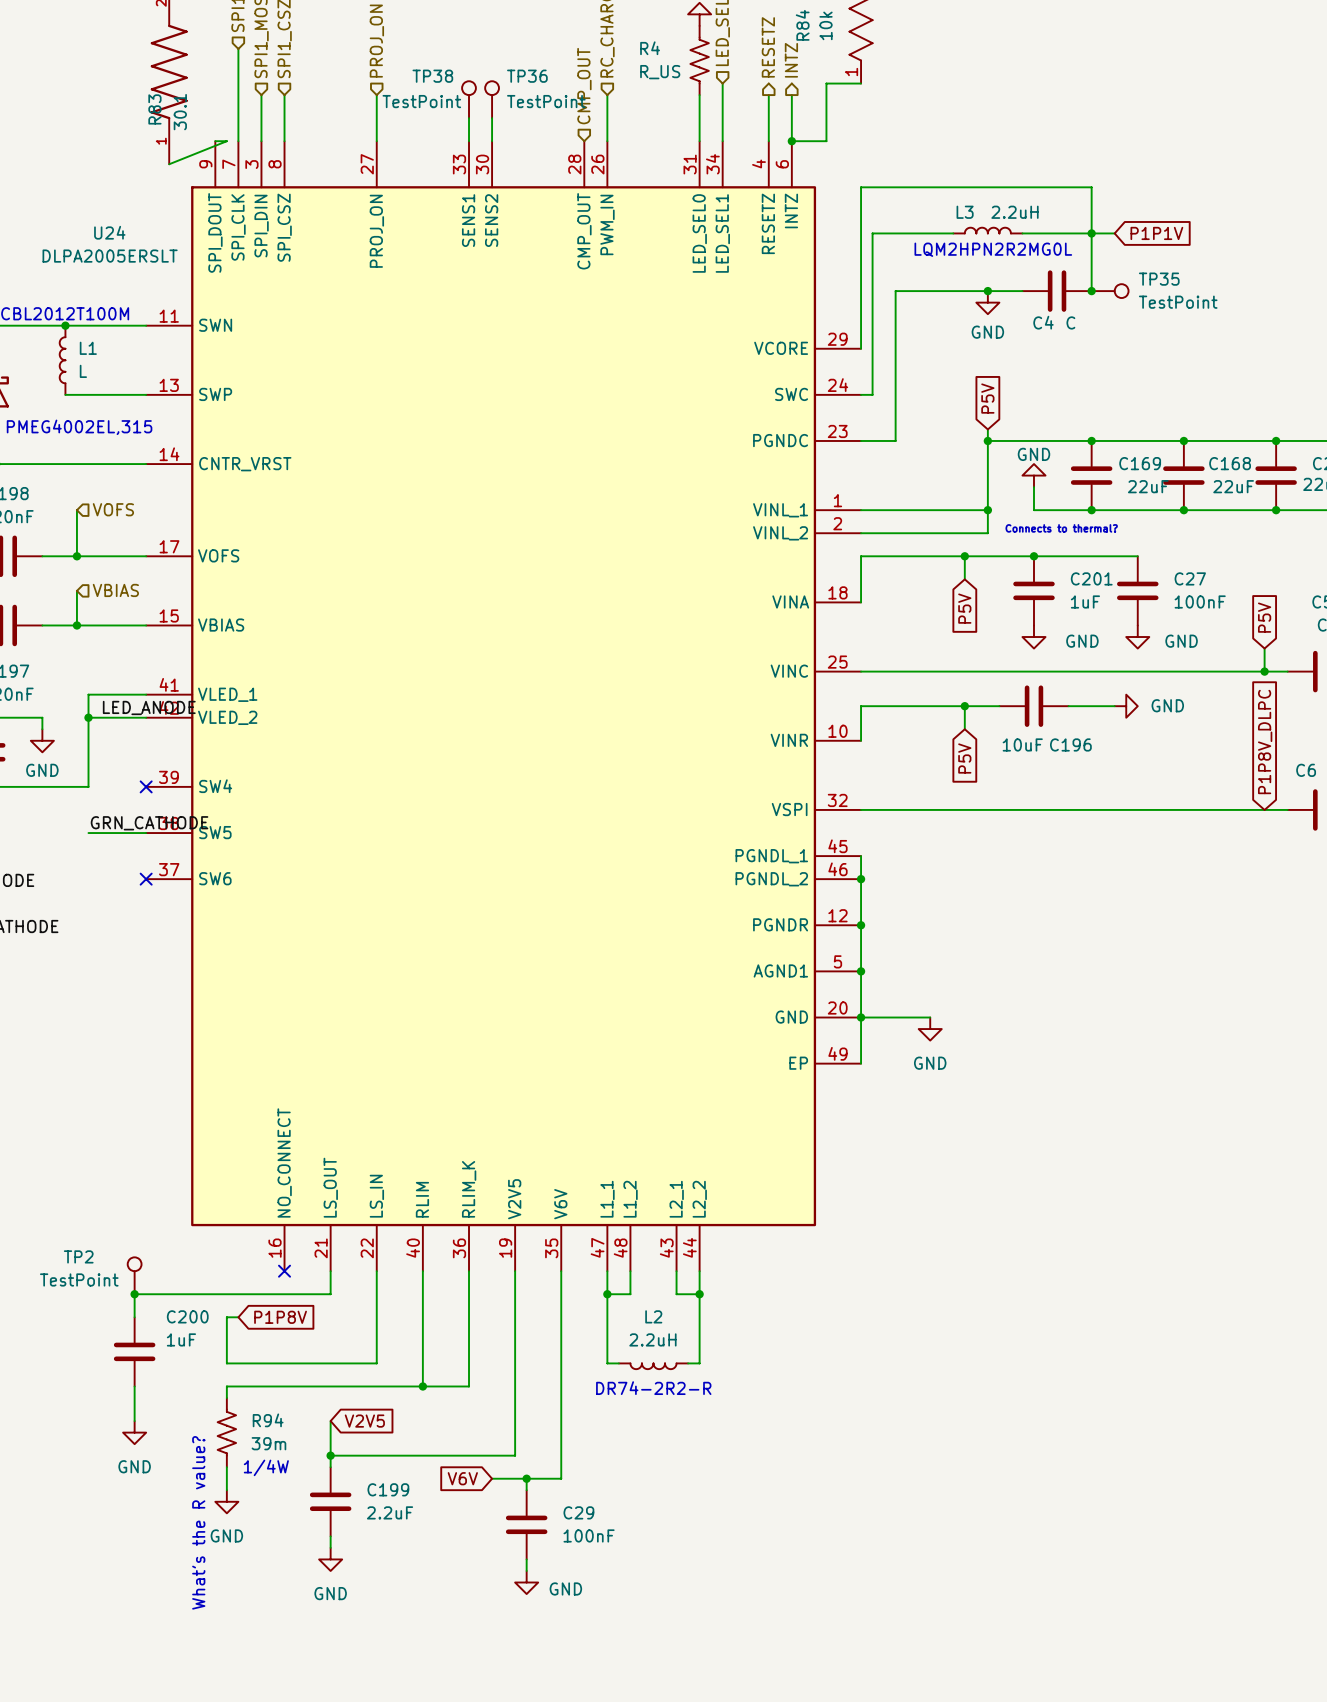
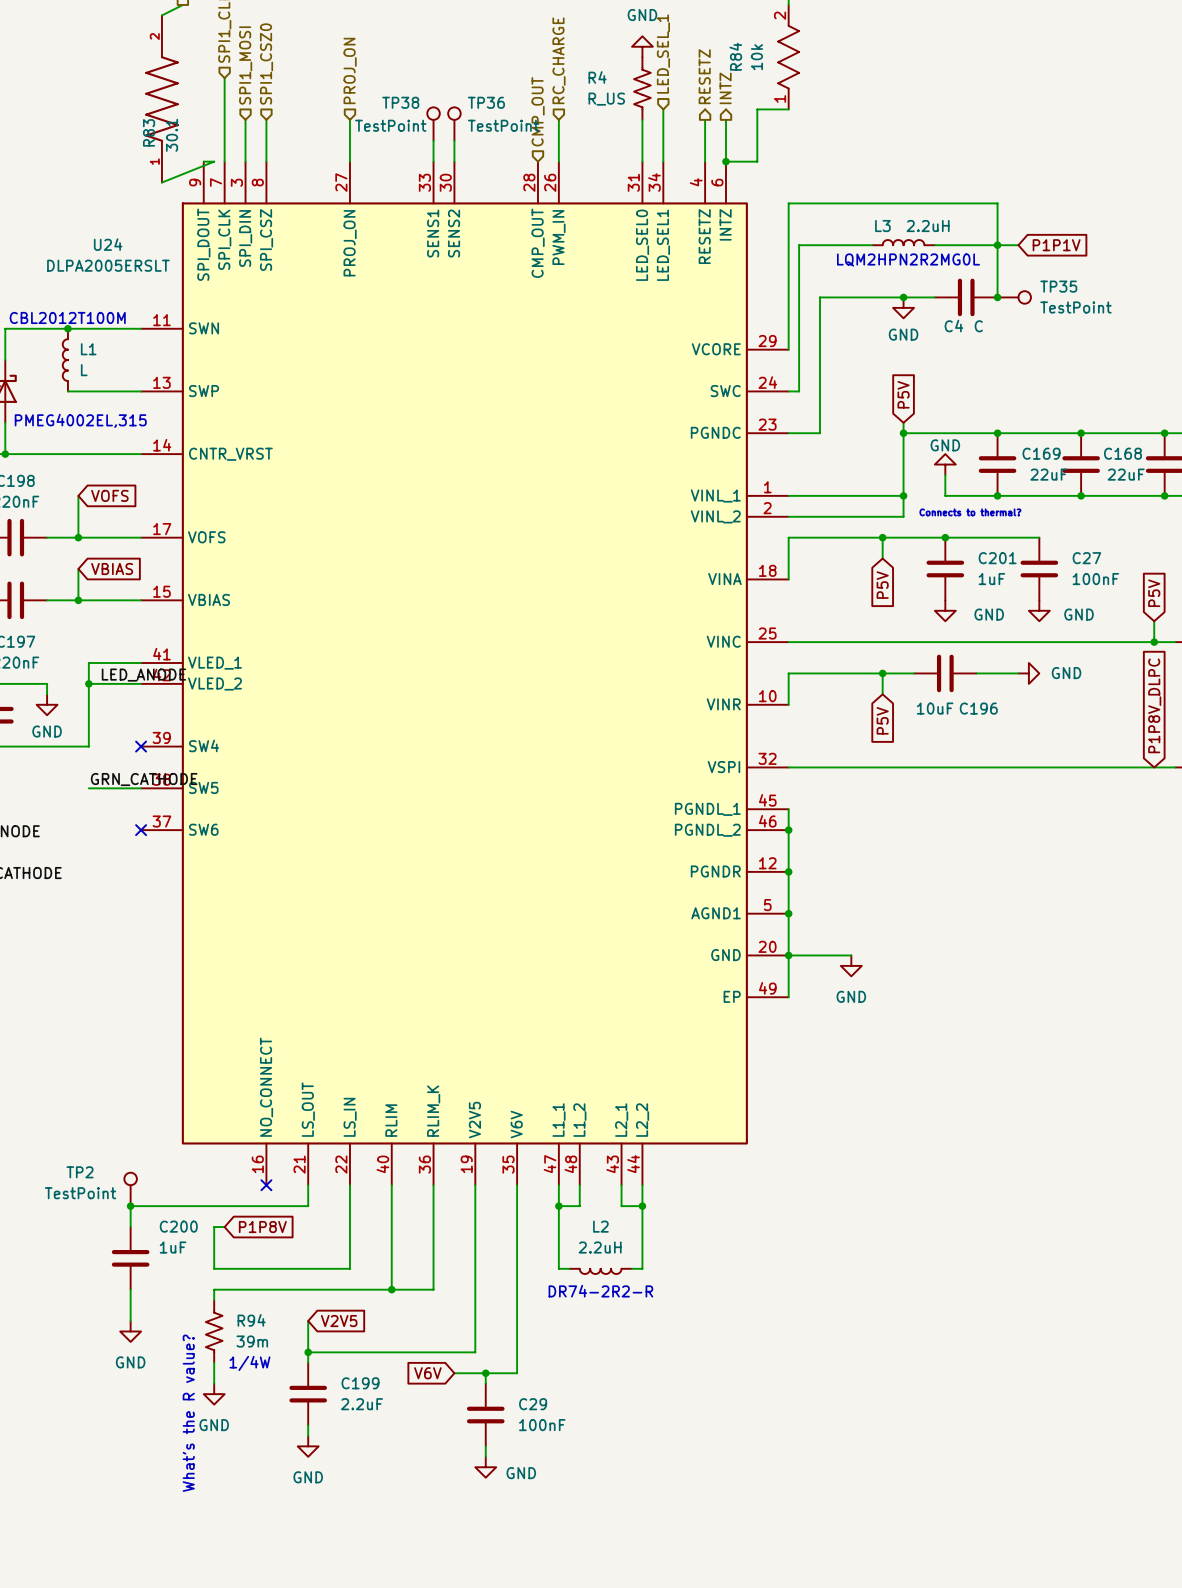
hierarchical label: VOFS (113, 509) -> none
global label: none -> VOFS (109, 495)
global label: none -> VBIAS (112, 569)
hierarchical label: VBIAS (115, 590) -> none

